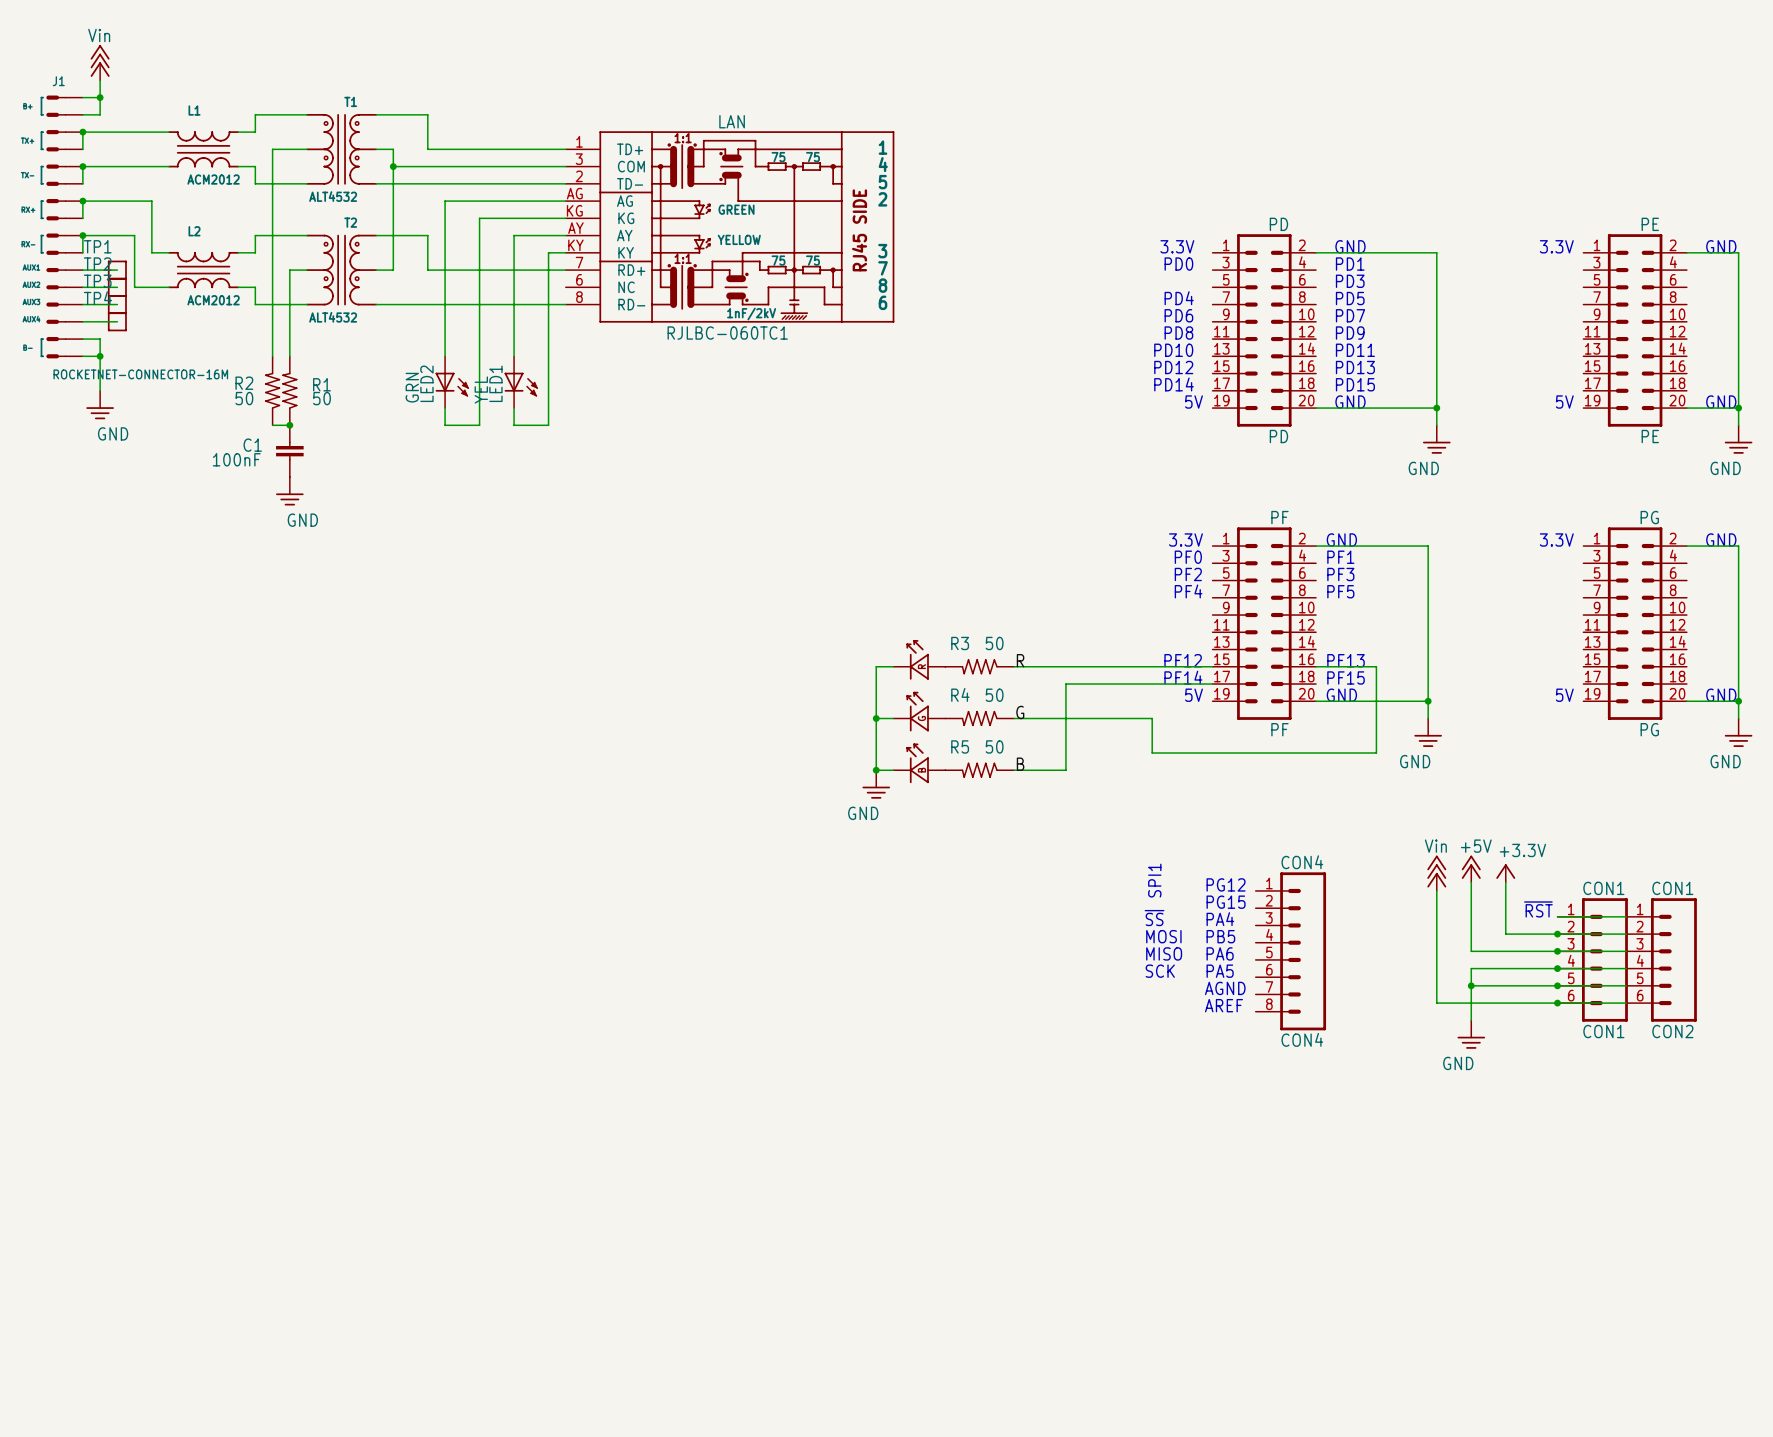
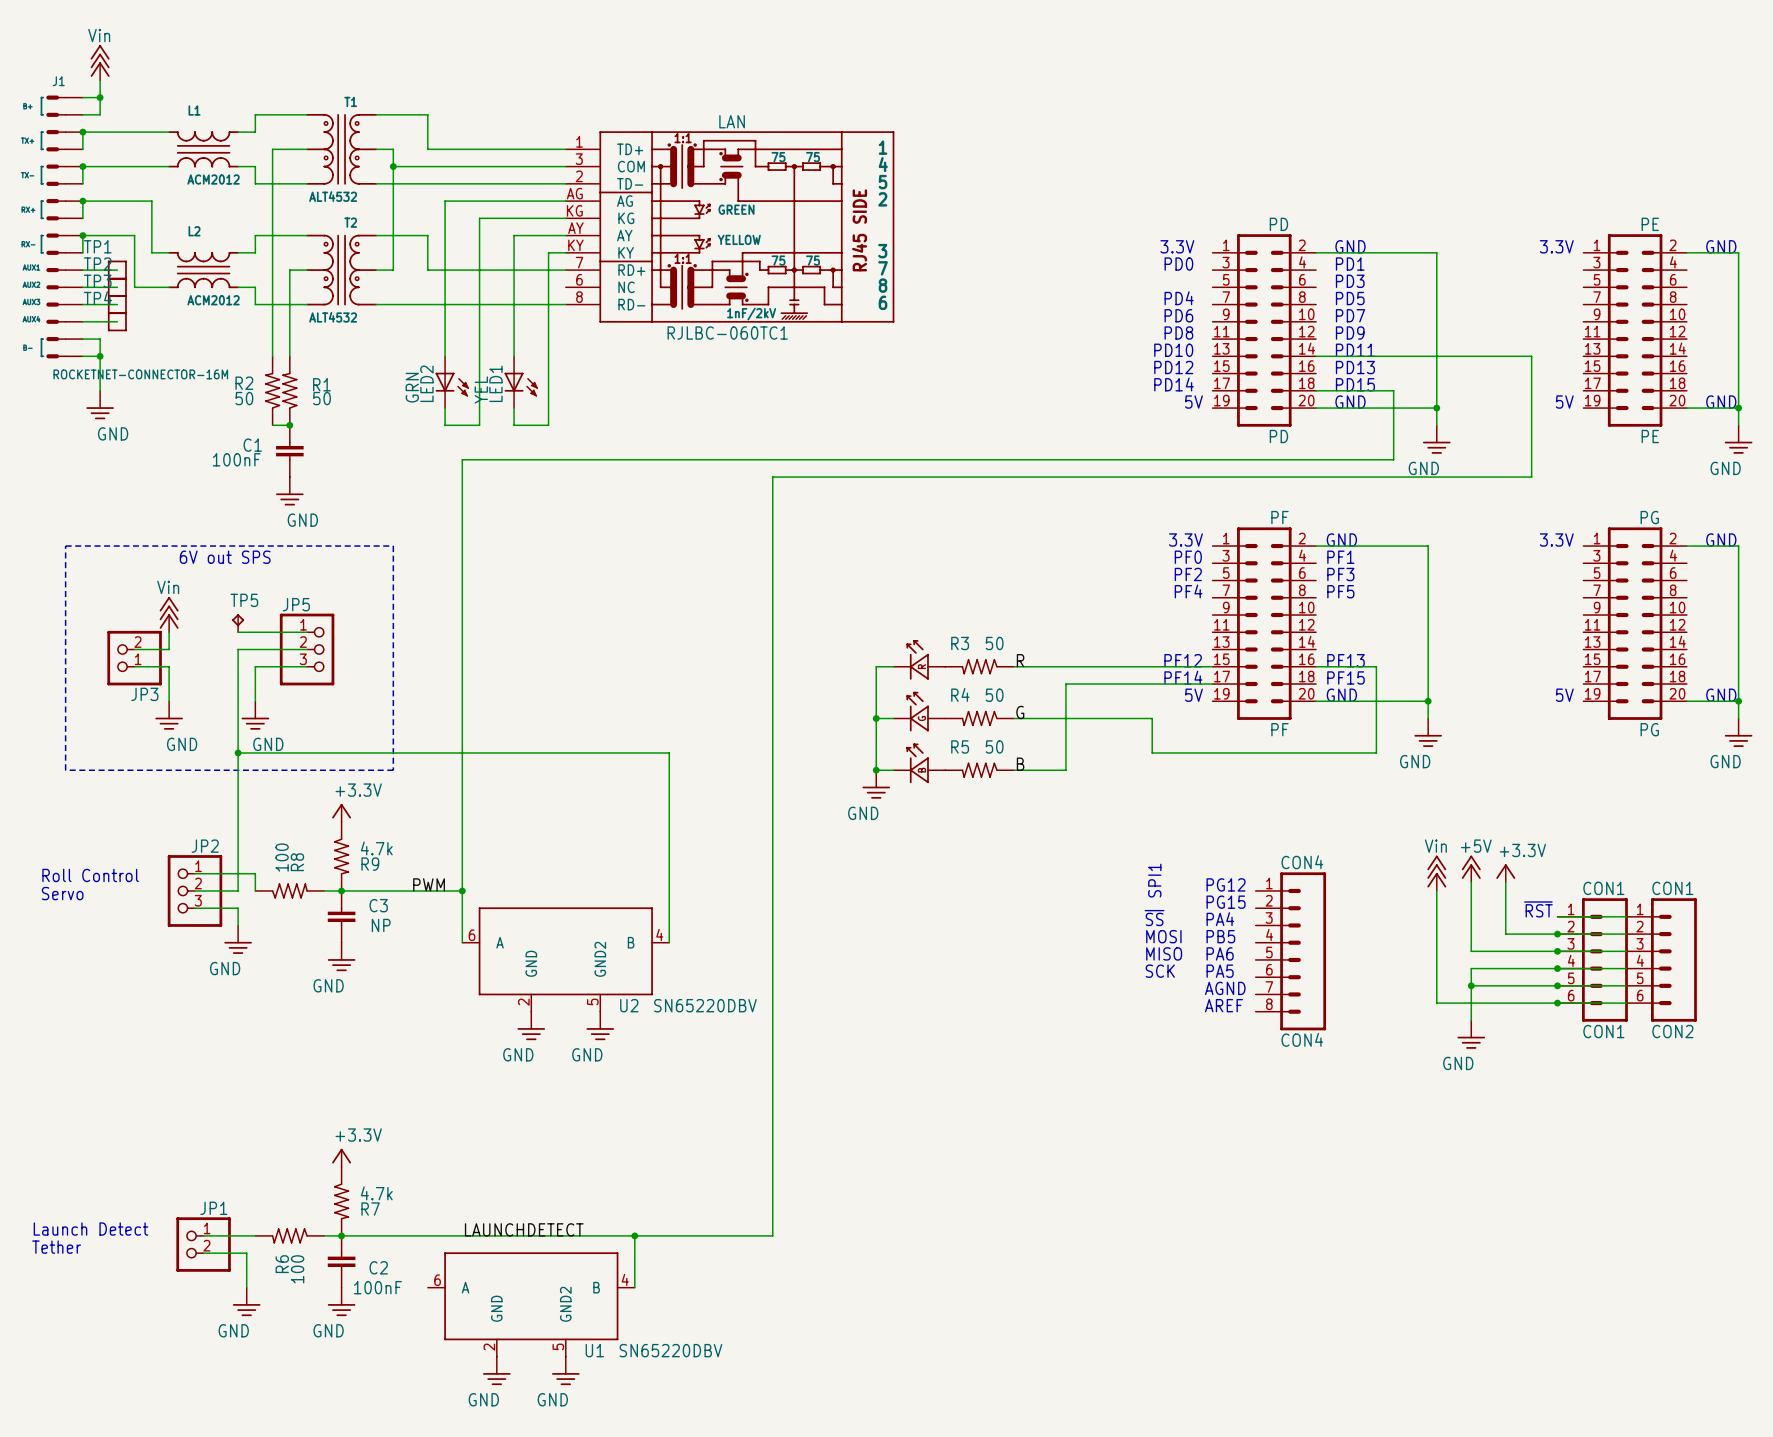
wire: none -> (1316, 356) (1531, 356) (1531, 477) (772, 477) (772, 1235) (324, 1235)
wire: none -> (1316, 390) (1393, 390) (1393, 459) (462, 459) (462, 942)
line: none -> (65, 546) (393, 546) (393, 770) (65, 770) (65, 546)
text: none -> 6V out SPS (225, 557)
power symbol: none -> Vin (169, 614)
TP5: none -> (238, 623)
wire: none -> (169, 632) (169, 649) (134, 649)
wire: none -> (238, 632) (307, 632)
wire: none -> (307, 649) (238, 649) (238, 890) (194, 890)
JP5: none -> (307, 649)
JP3: none -> (134, 658)
wire: none -> (134, 666) (169, 666) (169, 701)
wire: none -> (307, 666) (255, 666) (255, 701)
power symbol: none -> GND (169, 715)
power symbol: none -> GND (255, 715)
wire: none -> (238, 752) (669, 752) (669, 942)
junction: none -> (238, 752)
power symbol: none -> +3.3V (341, 812)
R9: none -> 4.7k (341, 856)
wire: none -> (194, 873) (255, 873) (255, 890)
text: none -> Roll Control (90, 875)
label: none -> PWM (429, 884)
JP2: none -> (194, 890)
R8: none -> 100 (289, 890)
wire: none -> (324, 890) (462, 890)
junction: none -> (341, 890)
junction: none -> (462, 890)
text: none -> Servo (62, 893)
wire: none -> (194, 908) (238, 908) (238, 925)
C3: none -> NP (341, 916)
power symbol: none -> GND (238, 939)
power symbol: none -> GND (341, 956)
U2: none -> SN65220DBV (565, 959)
power symbol: none -> GND (531, 1025)
power symbol: none -> GND (600, 1025)
power symbol: none -> +3.3V (341, 1157)
R7: none -> 4.7k (341, 1201)
text: none -> Launch Detect (91, 1229)
label: none -> LAUNCHDETECT (524, 1229)
wire: none -> (203, 1235) (255, 1235)
R6: none -> 100 (289, 1235)
junction: none -> (341, 1235)
wire: none -> (634, 1235) (634, 1287)
junction: none -> (634, 1235)
JP1: none -> (203, 1244)
text: none -> Tether (56, 1247)
wire: none -> (203, 1253) (246, 1253) (246, 1287)
C2: none -> 100nF (341, 1261)
power symbol: none -> GND (246, 1301)
power symbol: none -> GND (341, 1301)
U1: none -> SN65220DBV (531, 1304)
power symbol: none -> GND (496, 1370)
power symbol: none -> GND (565, 1370)

